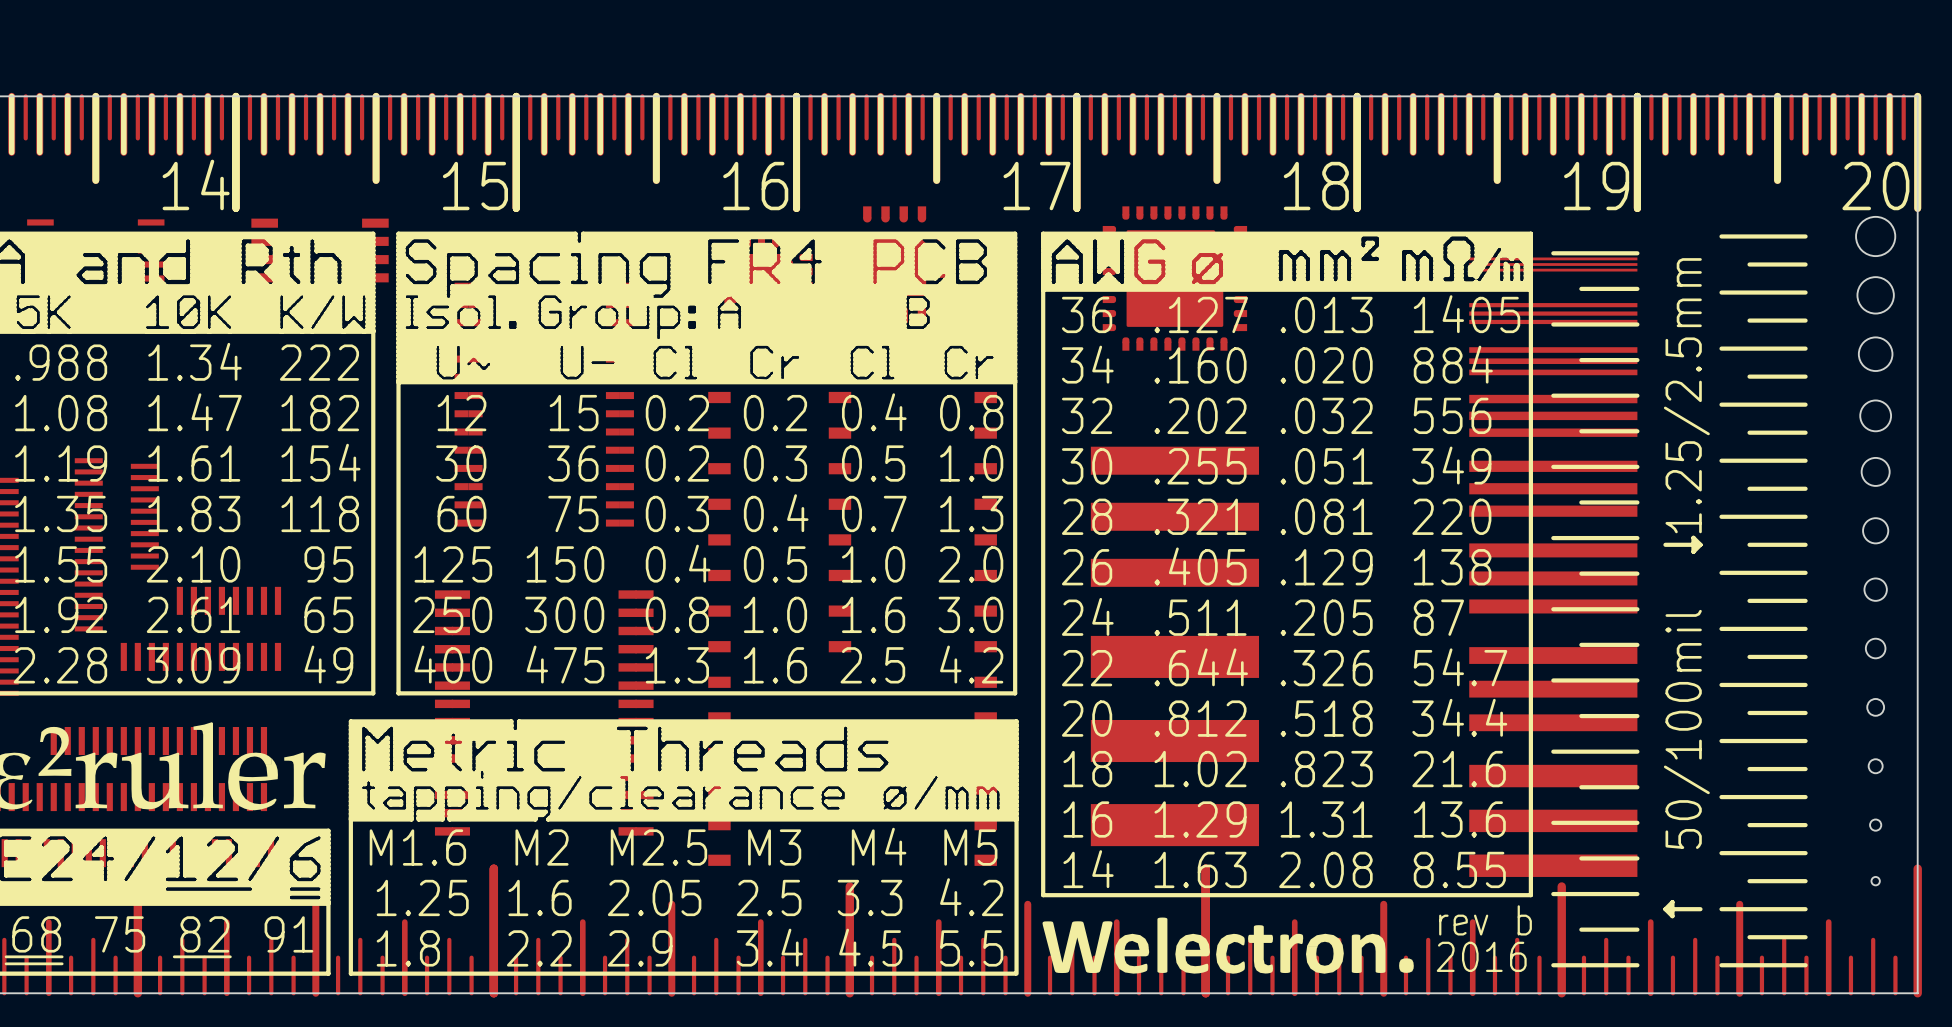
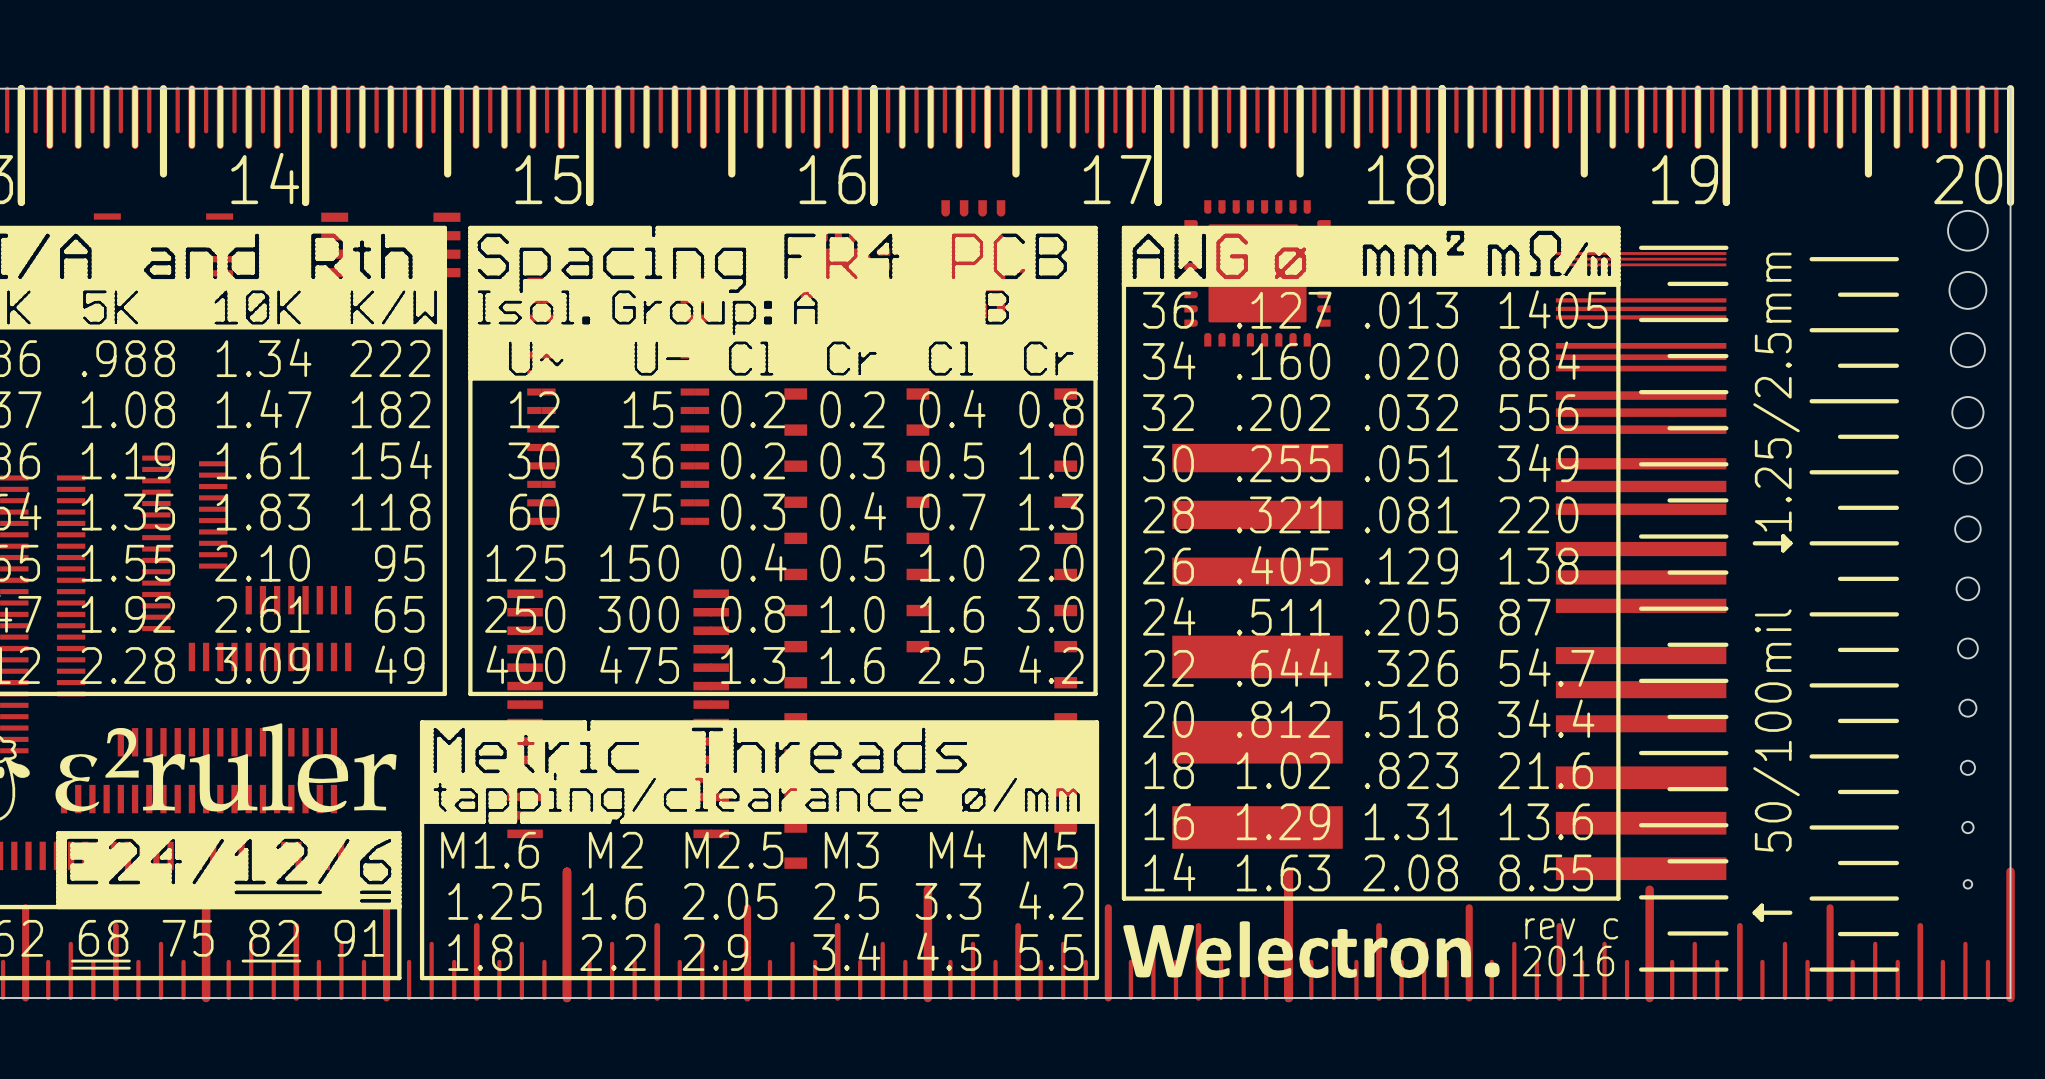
drawing shape: [1719, 234, 1808, 968] -> [1809, 257, 1900, 972]
text: b (1524, 920) -> c (1610, 928)

